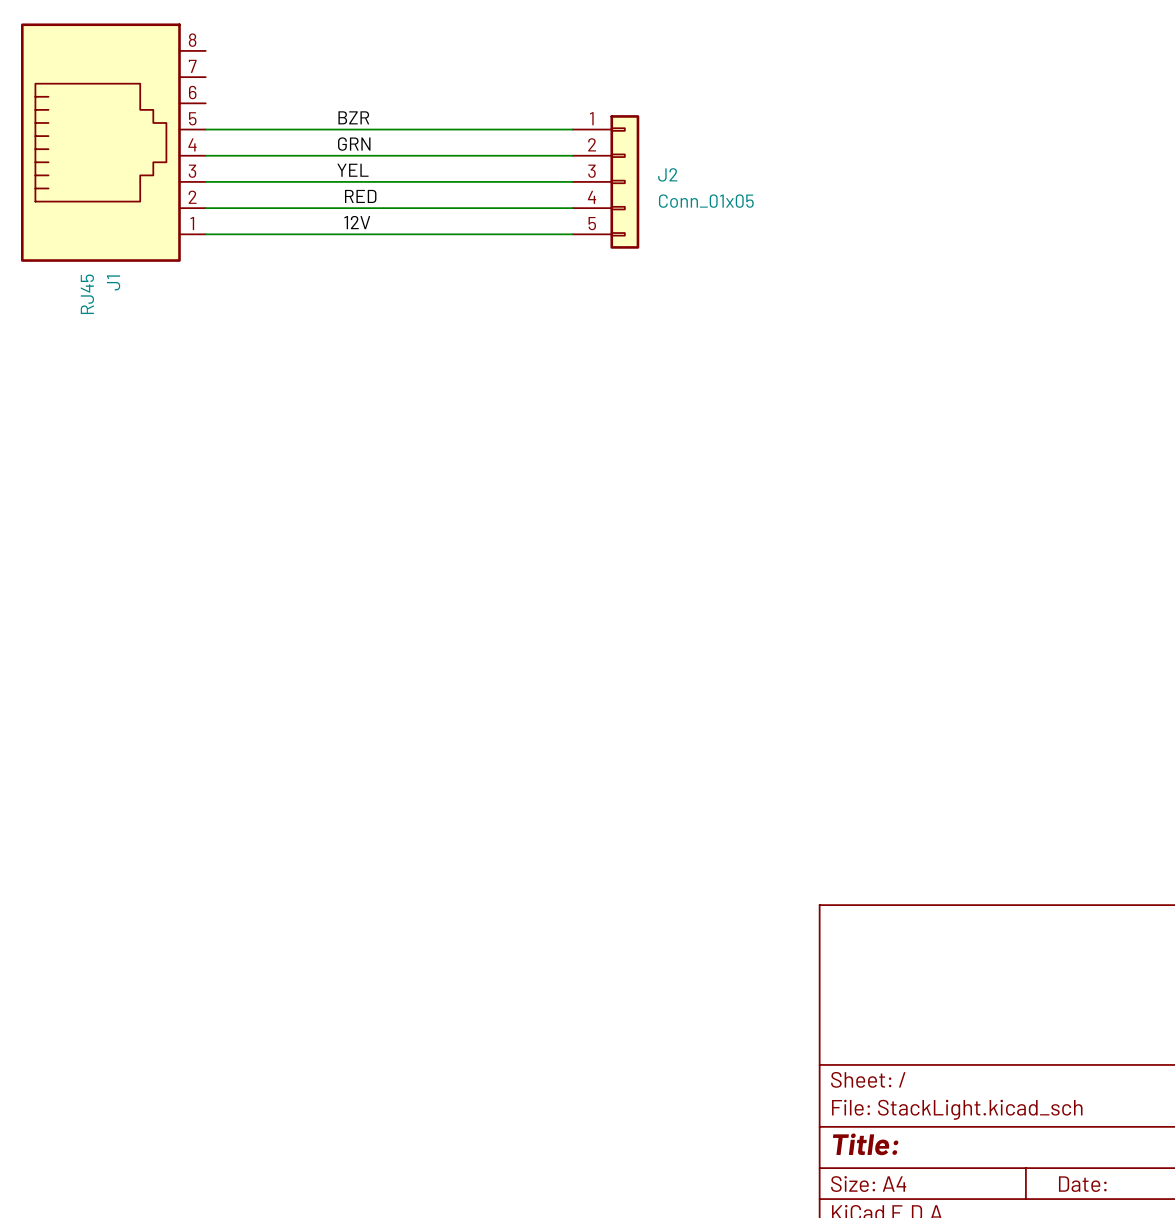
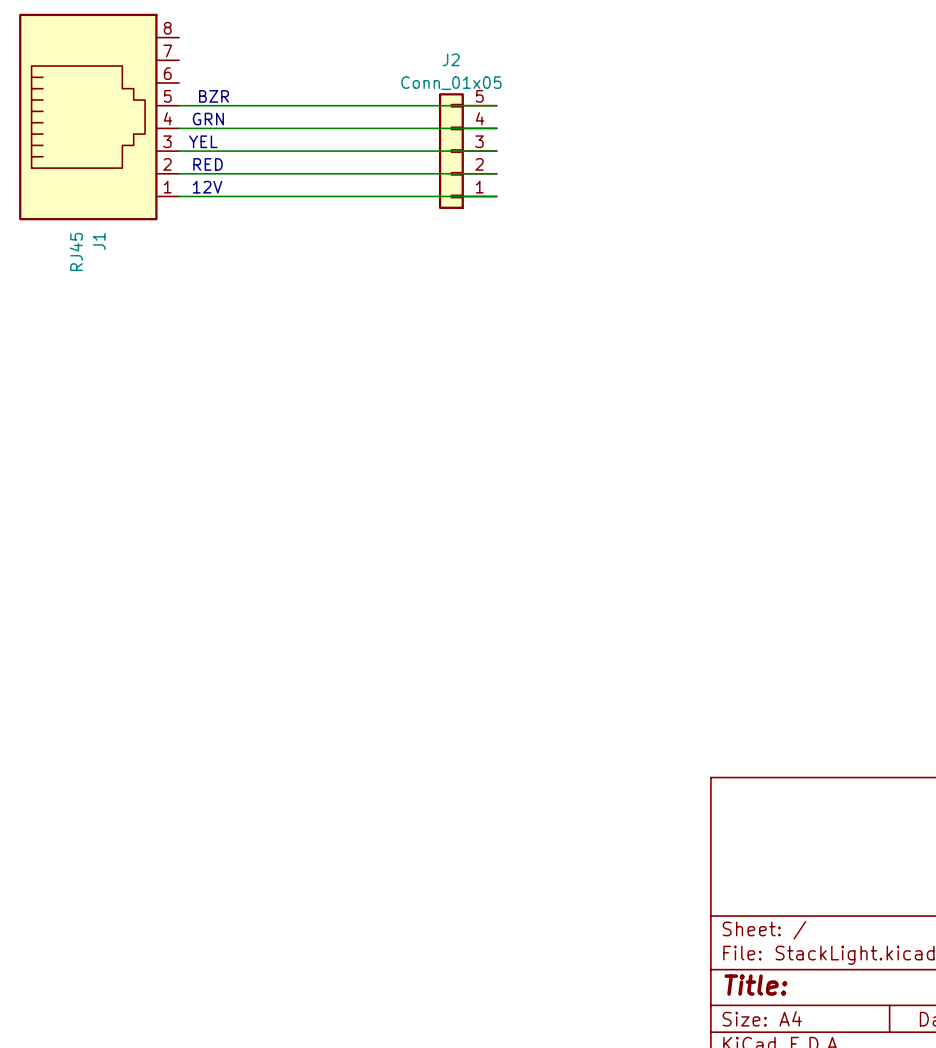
label: BZR (353, 117) -> none
text: none -> BZR (214, 96)
label: GRN (354, 144) -> none
text: none -> GRN (208, 119)
label: YEL (352, 170) -> none
text: none -> YEL (203, 141)
J2 name position: J2 (667, 174) -> J2 (451, 59)
J2 rotation: 0° (624, 181) -> 180° (451, 151)
label: RED (360, 196) -> none
text: none -> RED (208, 164)
J2 value position: Conn_01x05 (706, 201) -> Conn_01x05 (451, 83)
label: 12V (357, 222) -> none
text: none -> 12V (207, 187)

